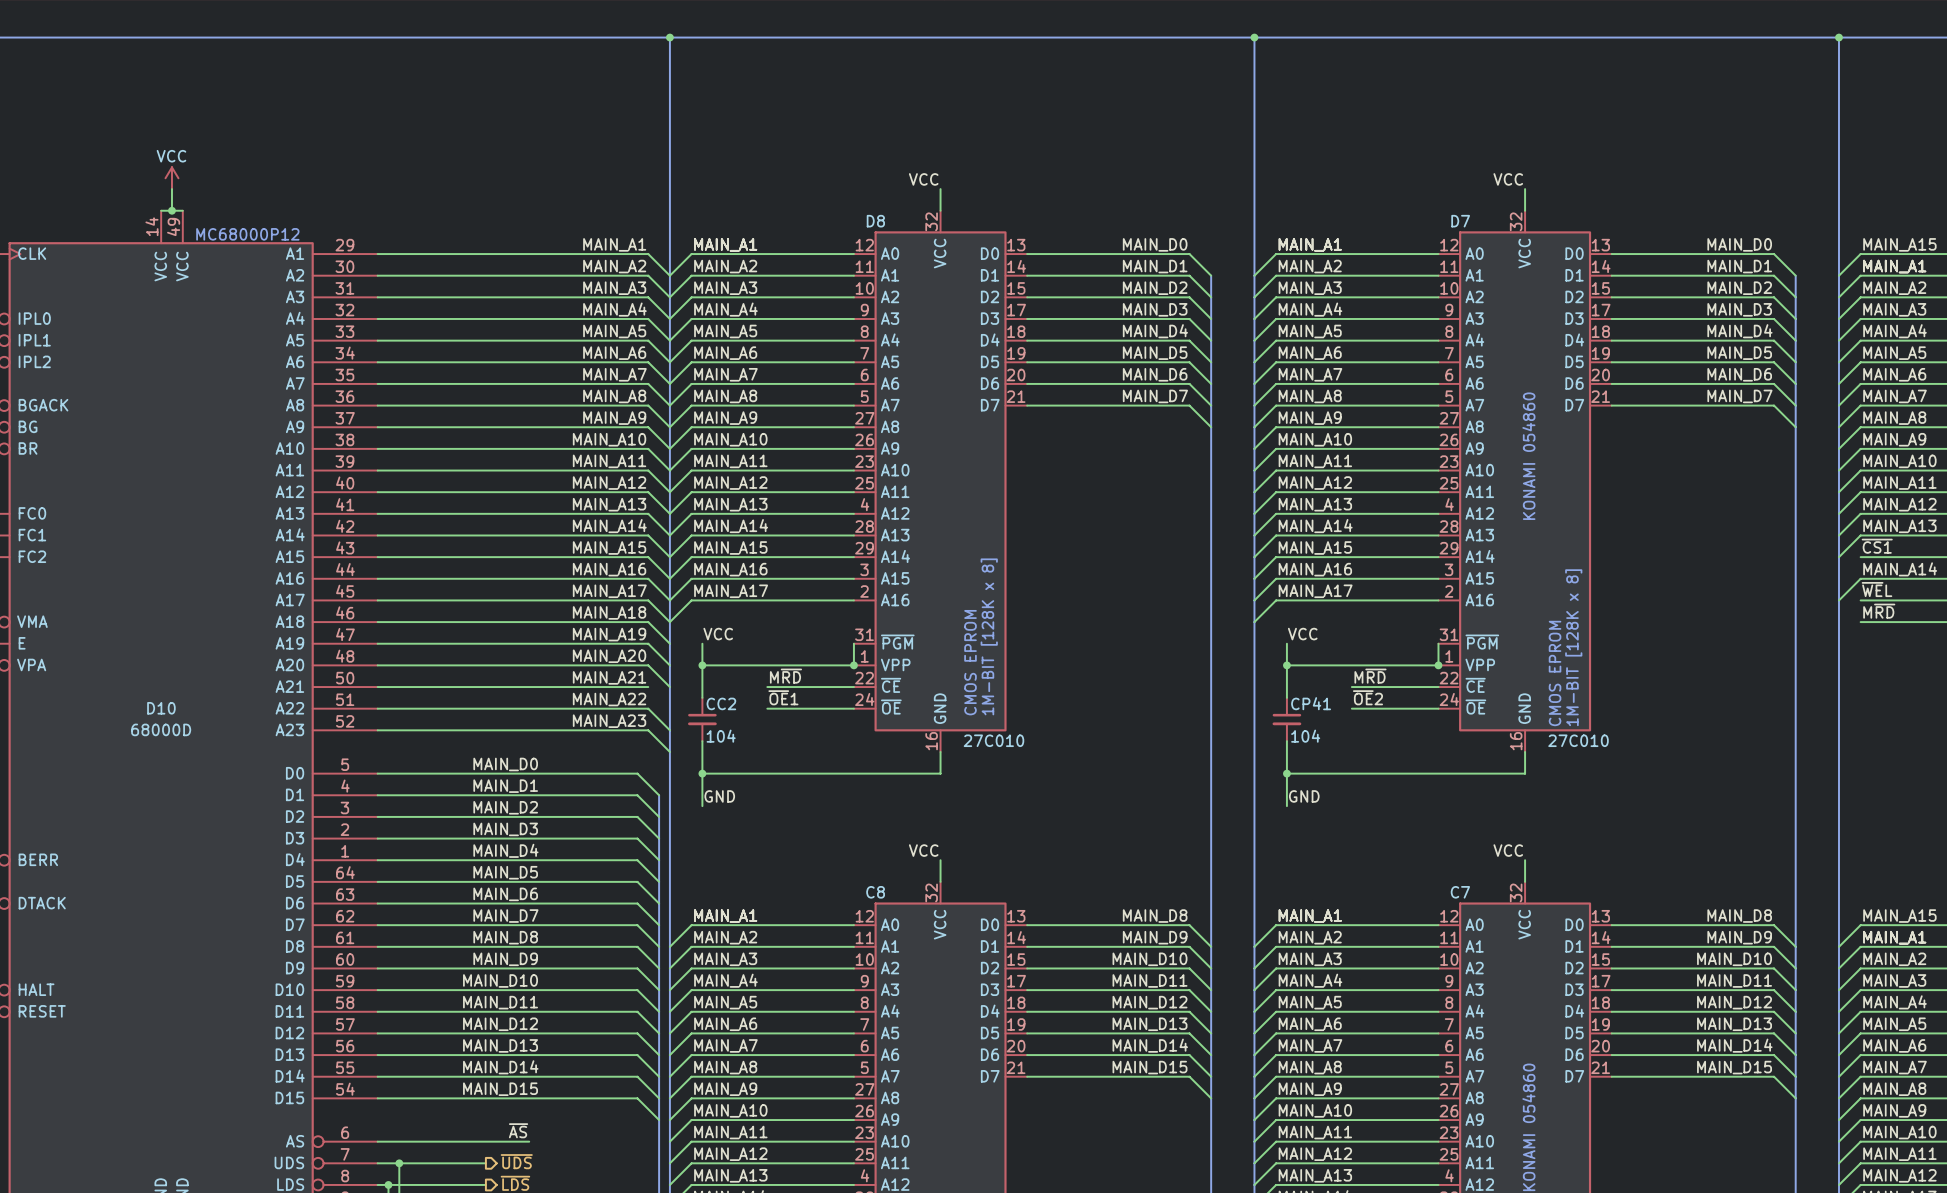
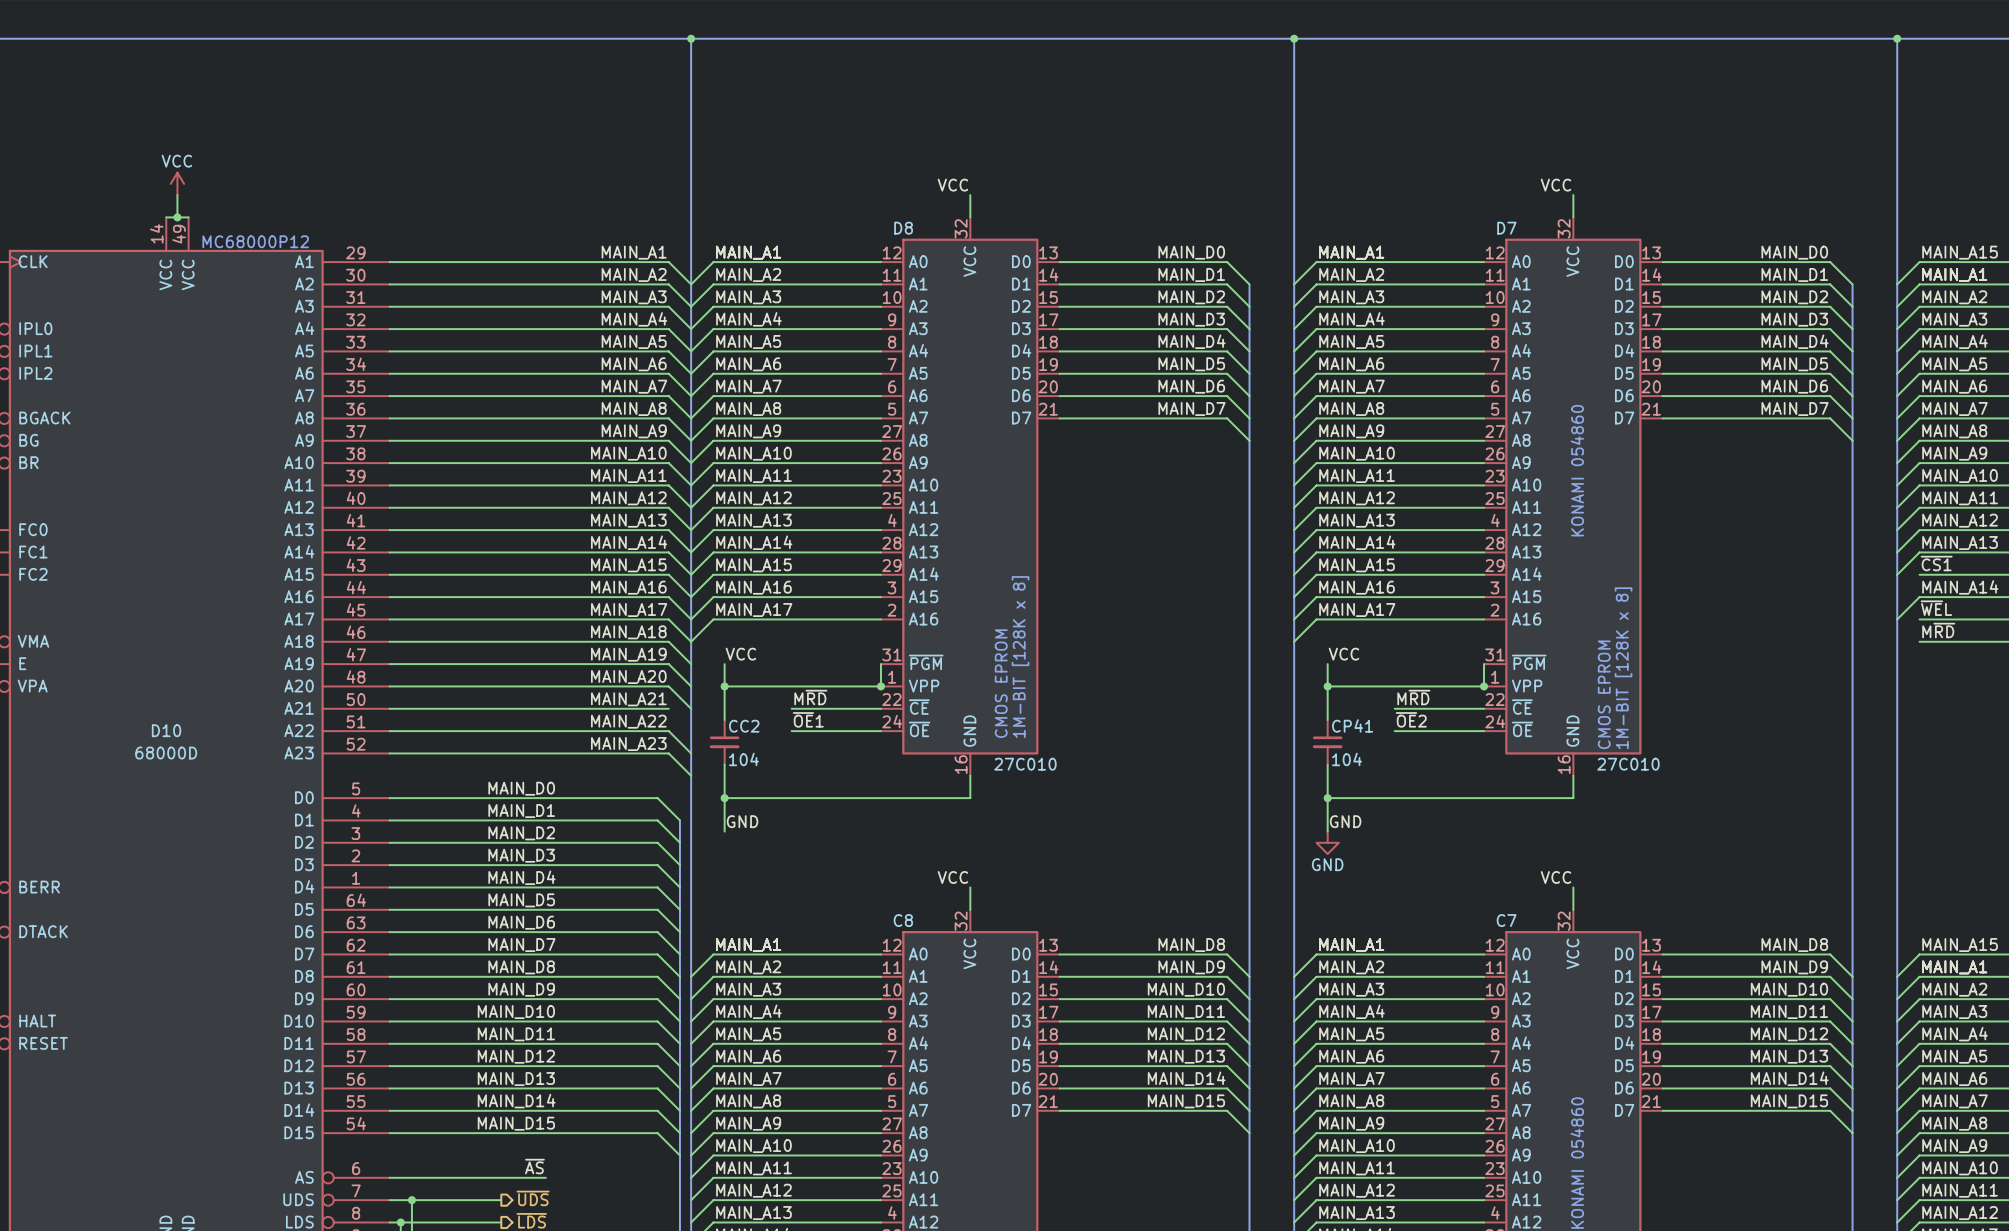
power symbol: none -> GND (1327, 842)

